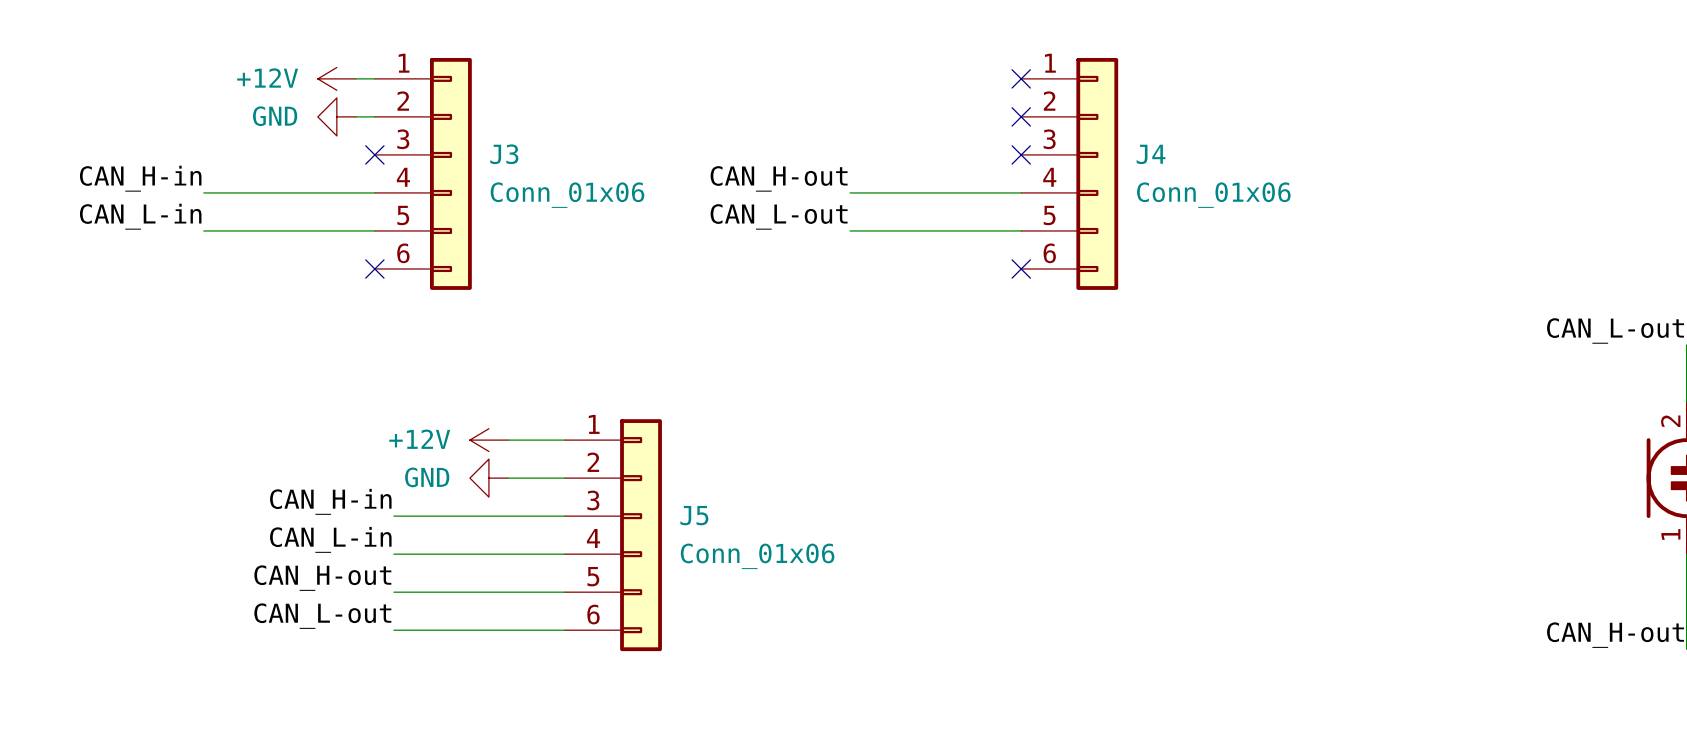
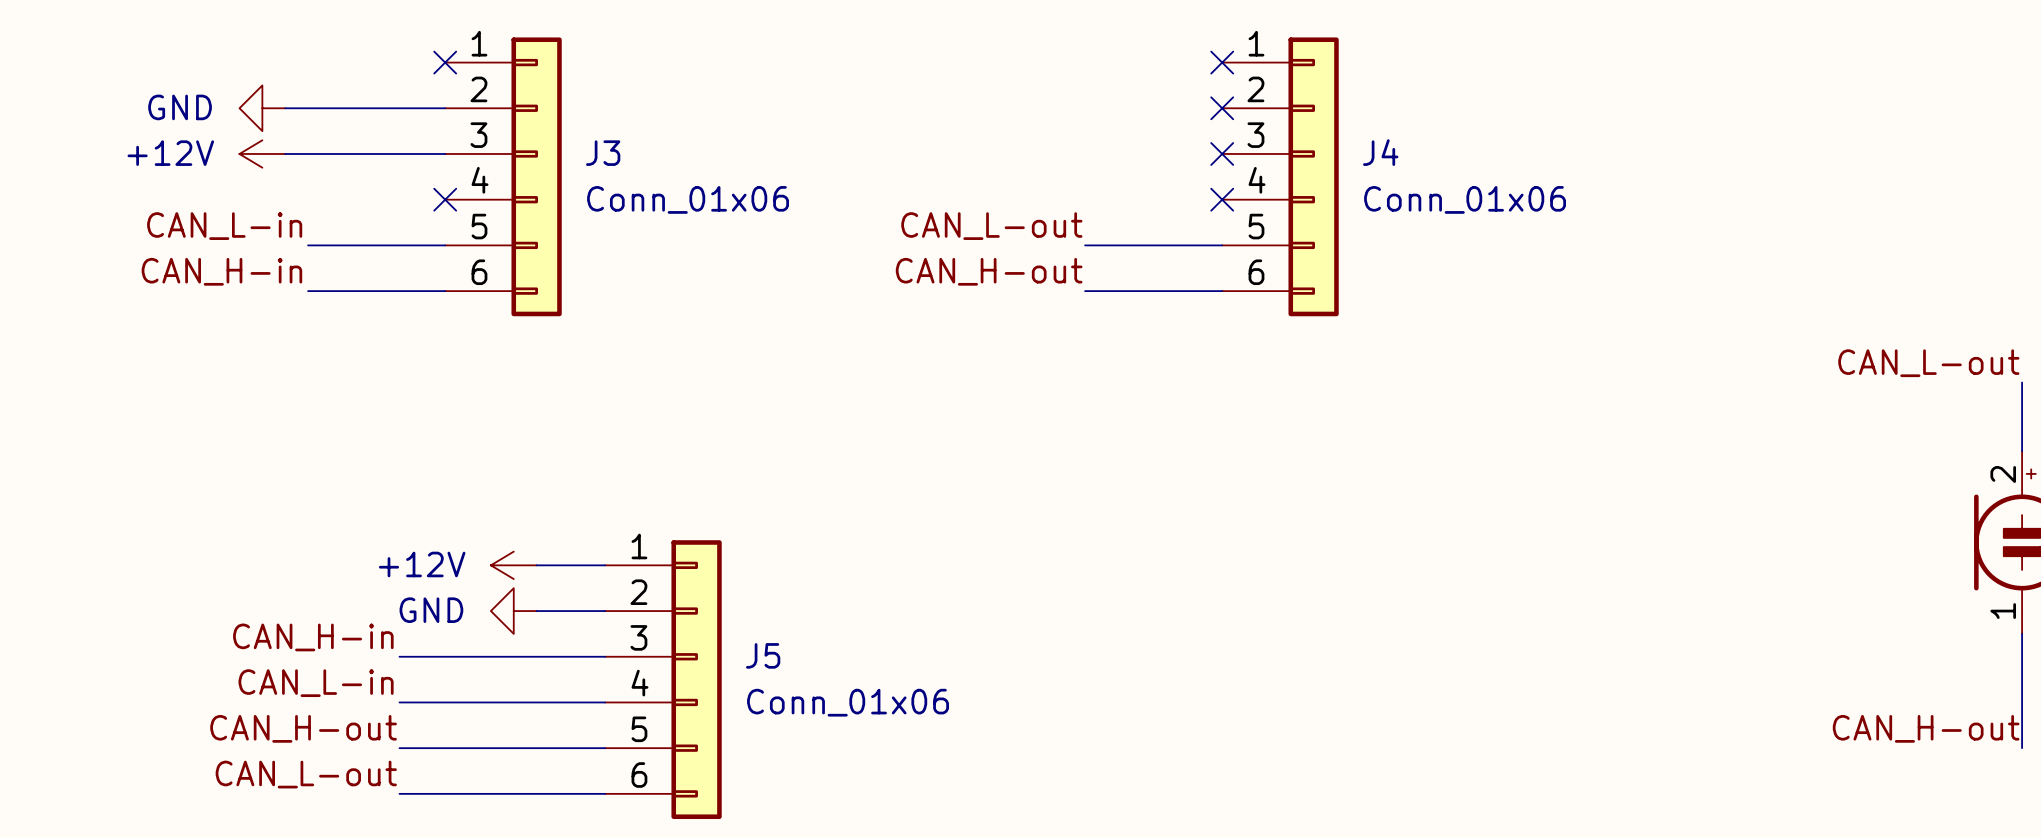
power symbol position: +12V (336, 78) -> +12V (262, 153)
wire: (355, 78) (374, 78) -> none
no-connect mark: none -> (445, 62)
wire: none -> (285, 108) (422, 108)
power symbol position: GND (336, 116) -> GND (262, 108)
wire: none -> (285, 153) (445, 153)
no-connect mark: (374, 154) -> none
label position: CAN_H-in (140, 178) -> CAN_H-in (221, 271)
label position: CAN_H-out (779, 178) -> CAN_H-out (989, 271)
wire: (203, 192) (374, 192) -> none
no-connect mark: none -> (445, 199)
wire: (850, 192) (1021, 192) -> none
label position: CAN_L-in (140, 216) -> CAN_L-in (224, 226)
label position: CAN_L-out (779, 216) -> CAN_L-out (991, 226)
wire: (203, 230) (260, 230) -> none
wire: (850, 230) (907, 230) -> none
wire: none -> (308, 291) (445, 291)
no-connect mark: (374, 269) -> none
wire: none -> (1085, 291) (1222, 291)
no-connect mark position: (1021, 269) -> (1222, 199)
power symbol position: +12V (488, 440) -> +12V (513, 565)
wire: (507, 440) (564, 440) -> (536, 565) (605, 565)
power symbol position: GND (488, 478) -> GND (513, 611)
wire: (507, 478) (564, 478) -> (536, 611) (605, 611)
label position: CAN_H-in (330, 501) -> CAN_H-in (313, 637)
wire: (393, 516) (564, 516) -> (399, 656) (605, 656)
J5 position: (613, 535) -> (663, 679)
label position: CAN_L-in (330, 539) -> CAN_L-in (316, 683)
wire: (393, 554) (564, 554) -> (399, 702) (605, 702)
label position: CAN_H-out (322, 578) -> CAN_H-out (303, 728)
wire: (393, 592) (564, 592) -> (399, 748) (605, 748)
label position: CAN_L-out (322, 616) -> CAN_L-out (306, 774)
wire: (393, 630) (564, 630) -> (399, 793) (605, 793)

